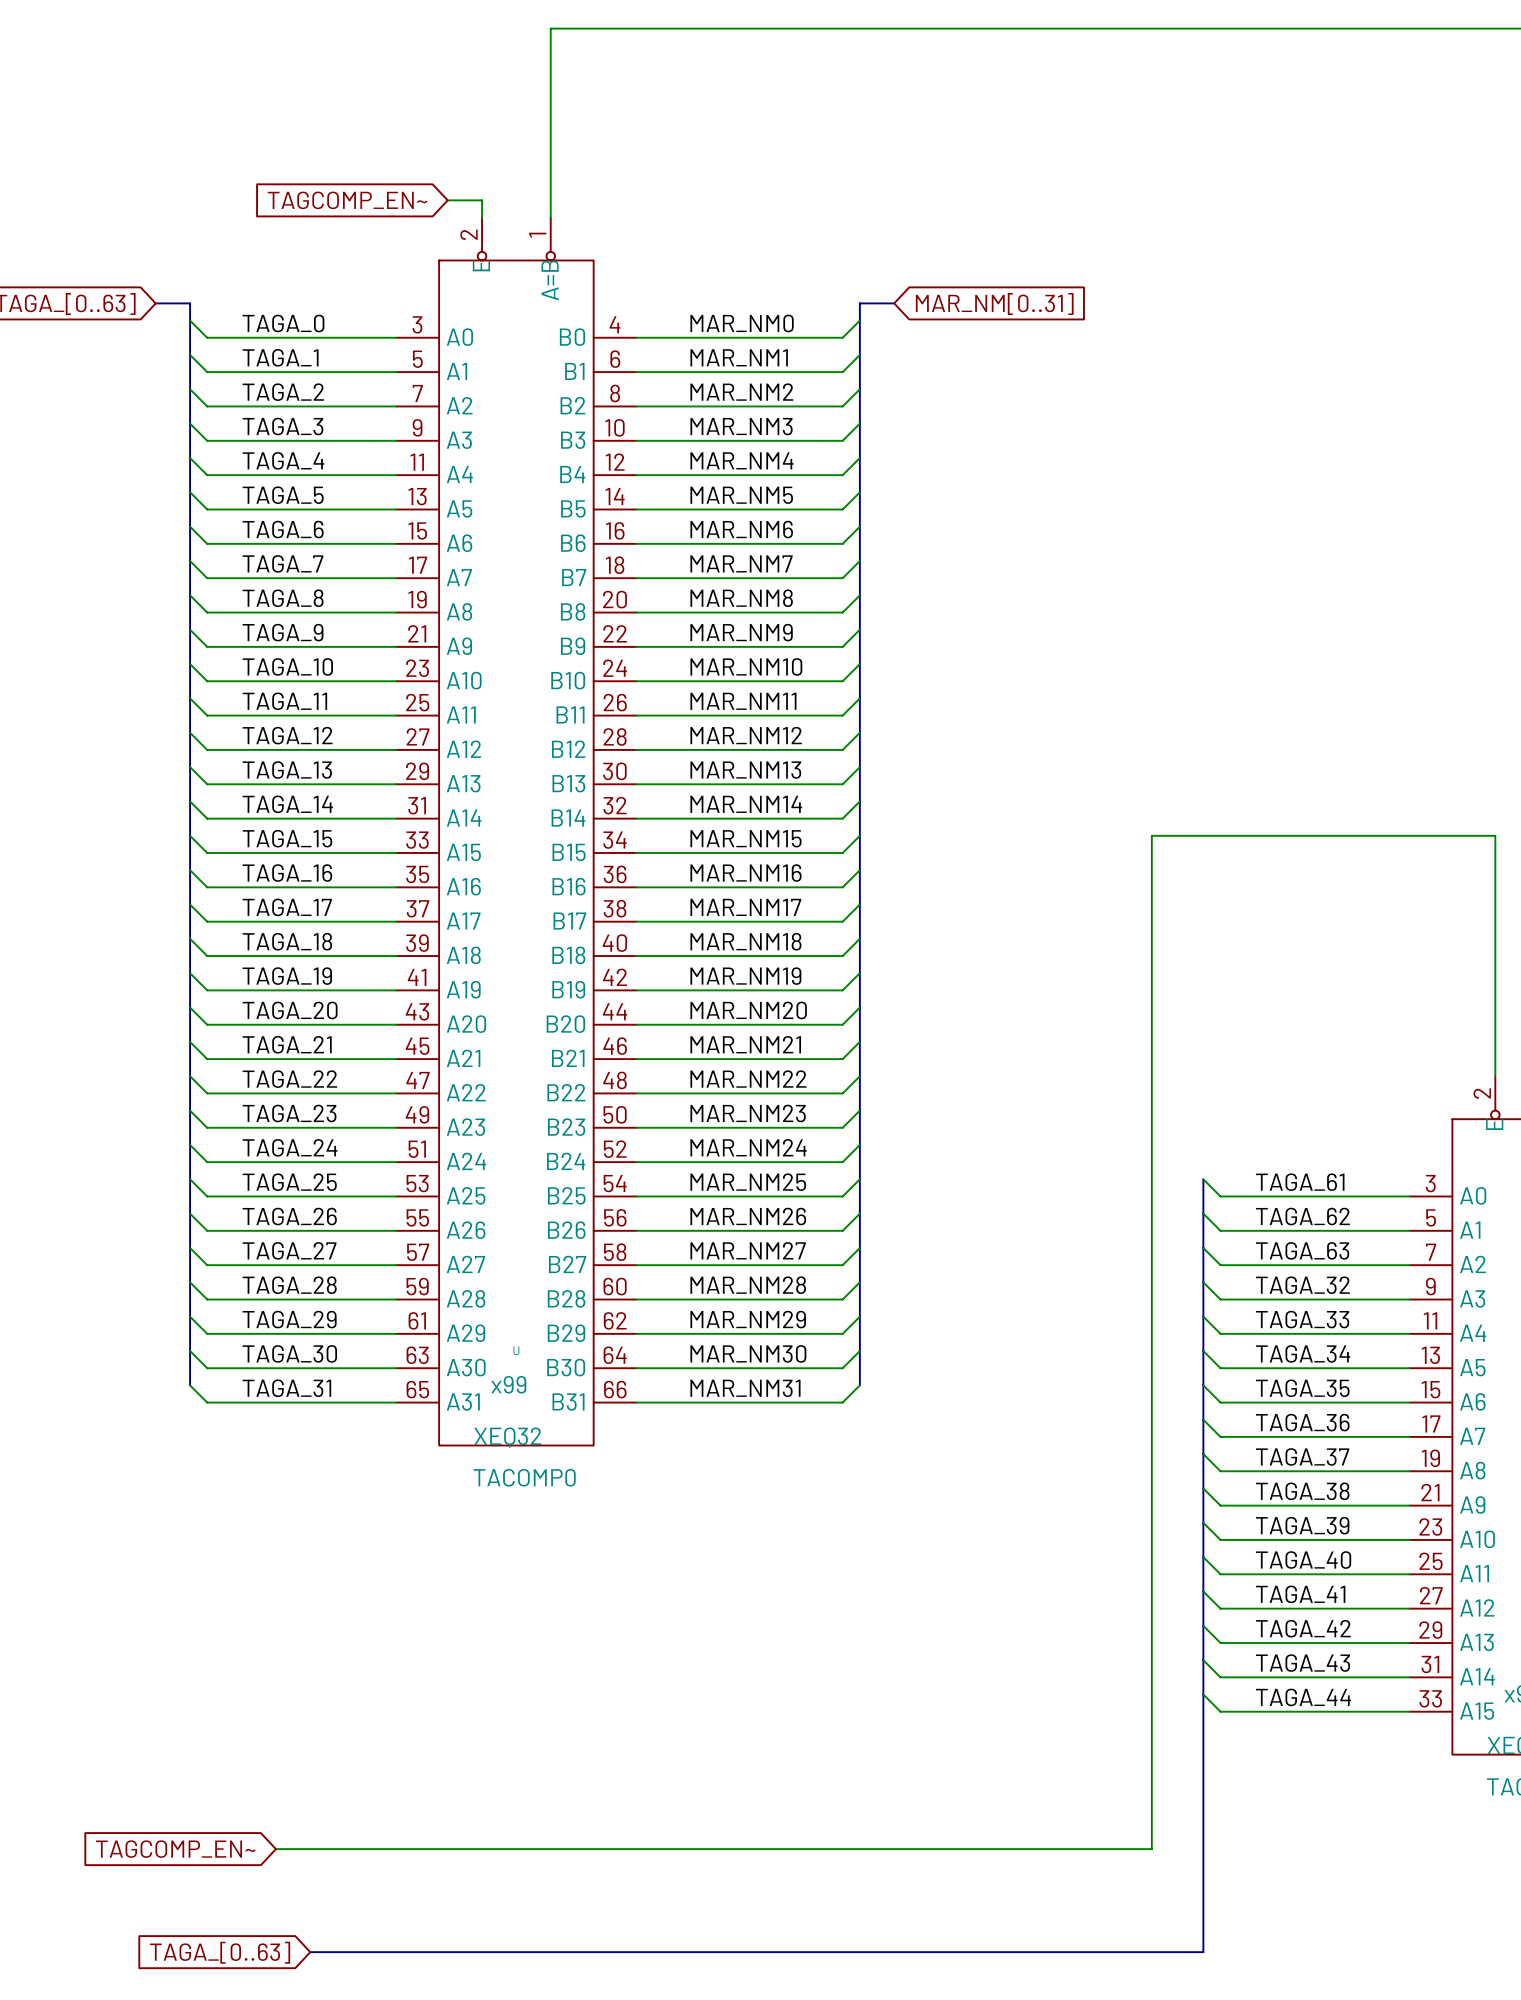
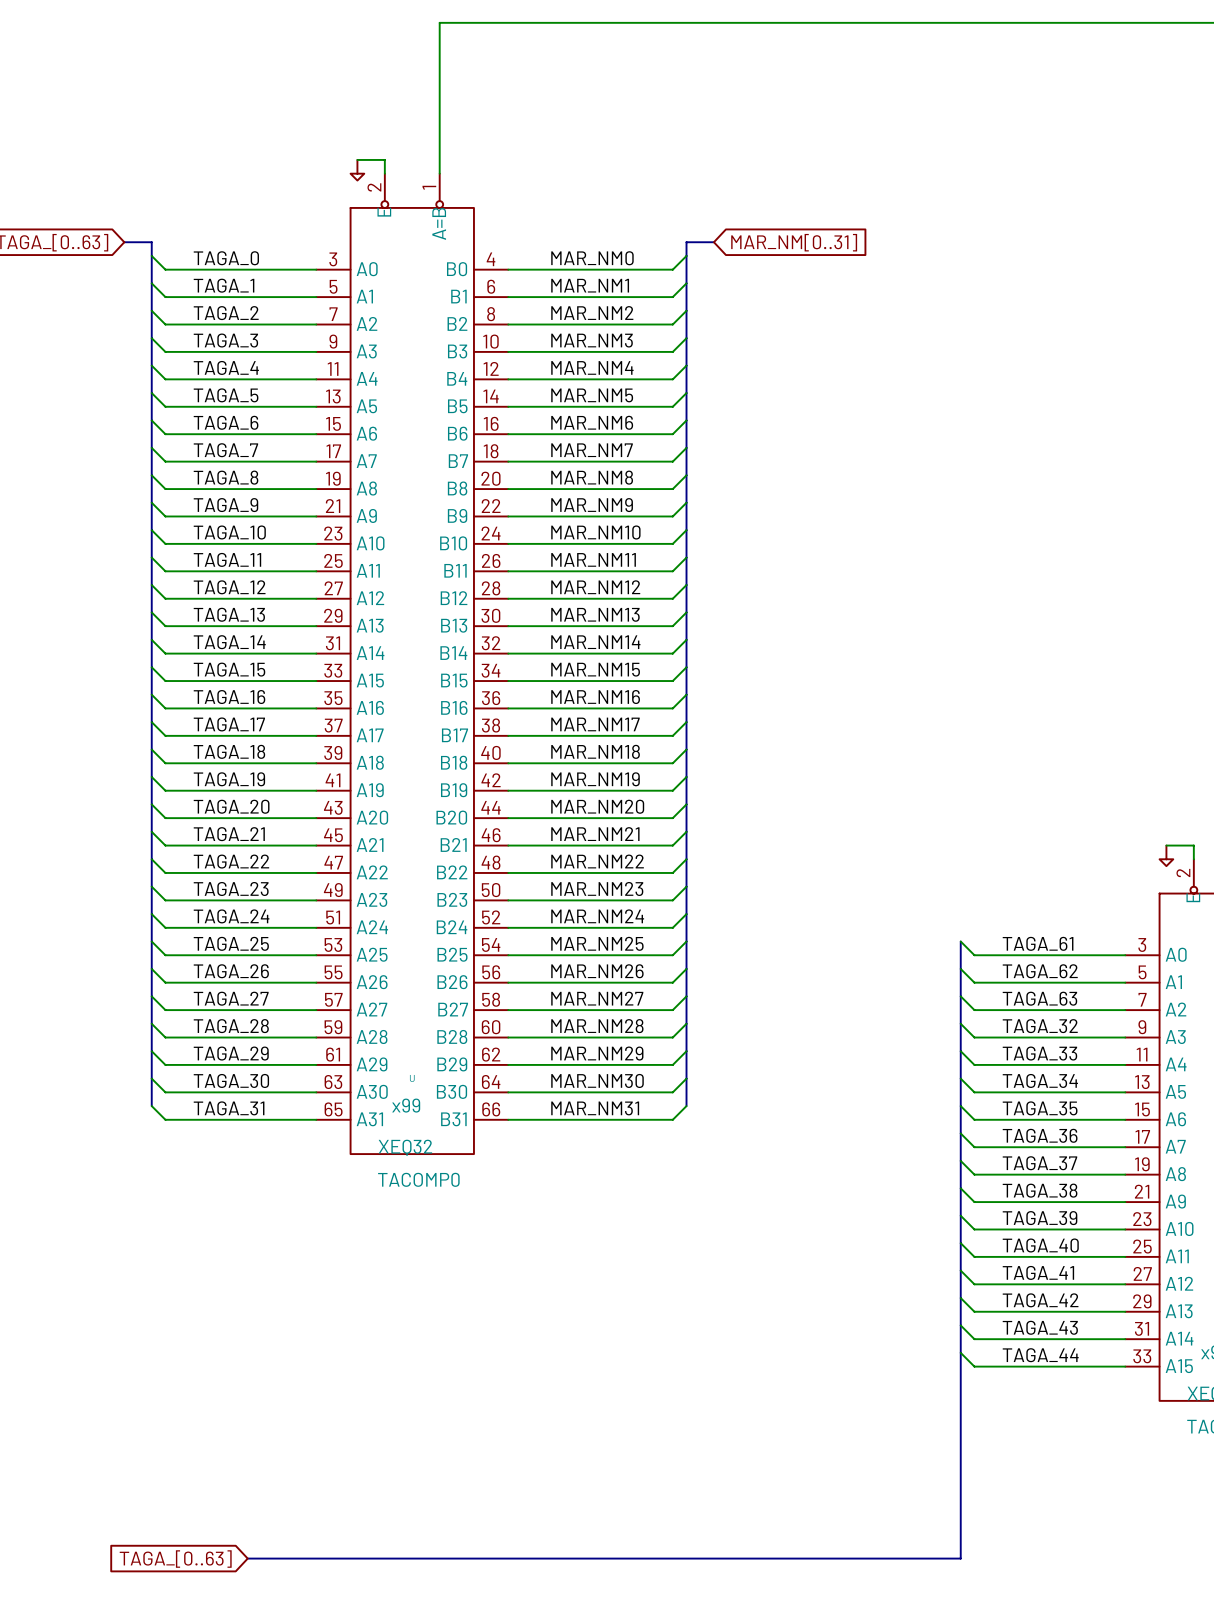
global label: TAGCOMP_EN~ (347, 200) -> none
power symbol: none -> (357, 170)
wire: (1495, 1059) (1495, 835) (1151, 835) (1151, 1849) (275, 1849) -> (1193, 845) (1166, 845)
power symbol: none -> (1166, 856)
global label: TAGCOMP_EN~ (175, 1849) -> none

